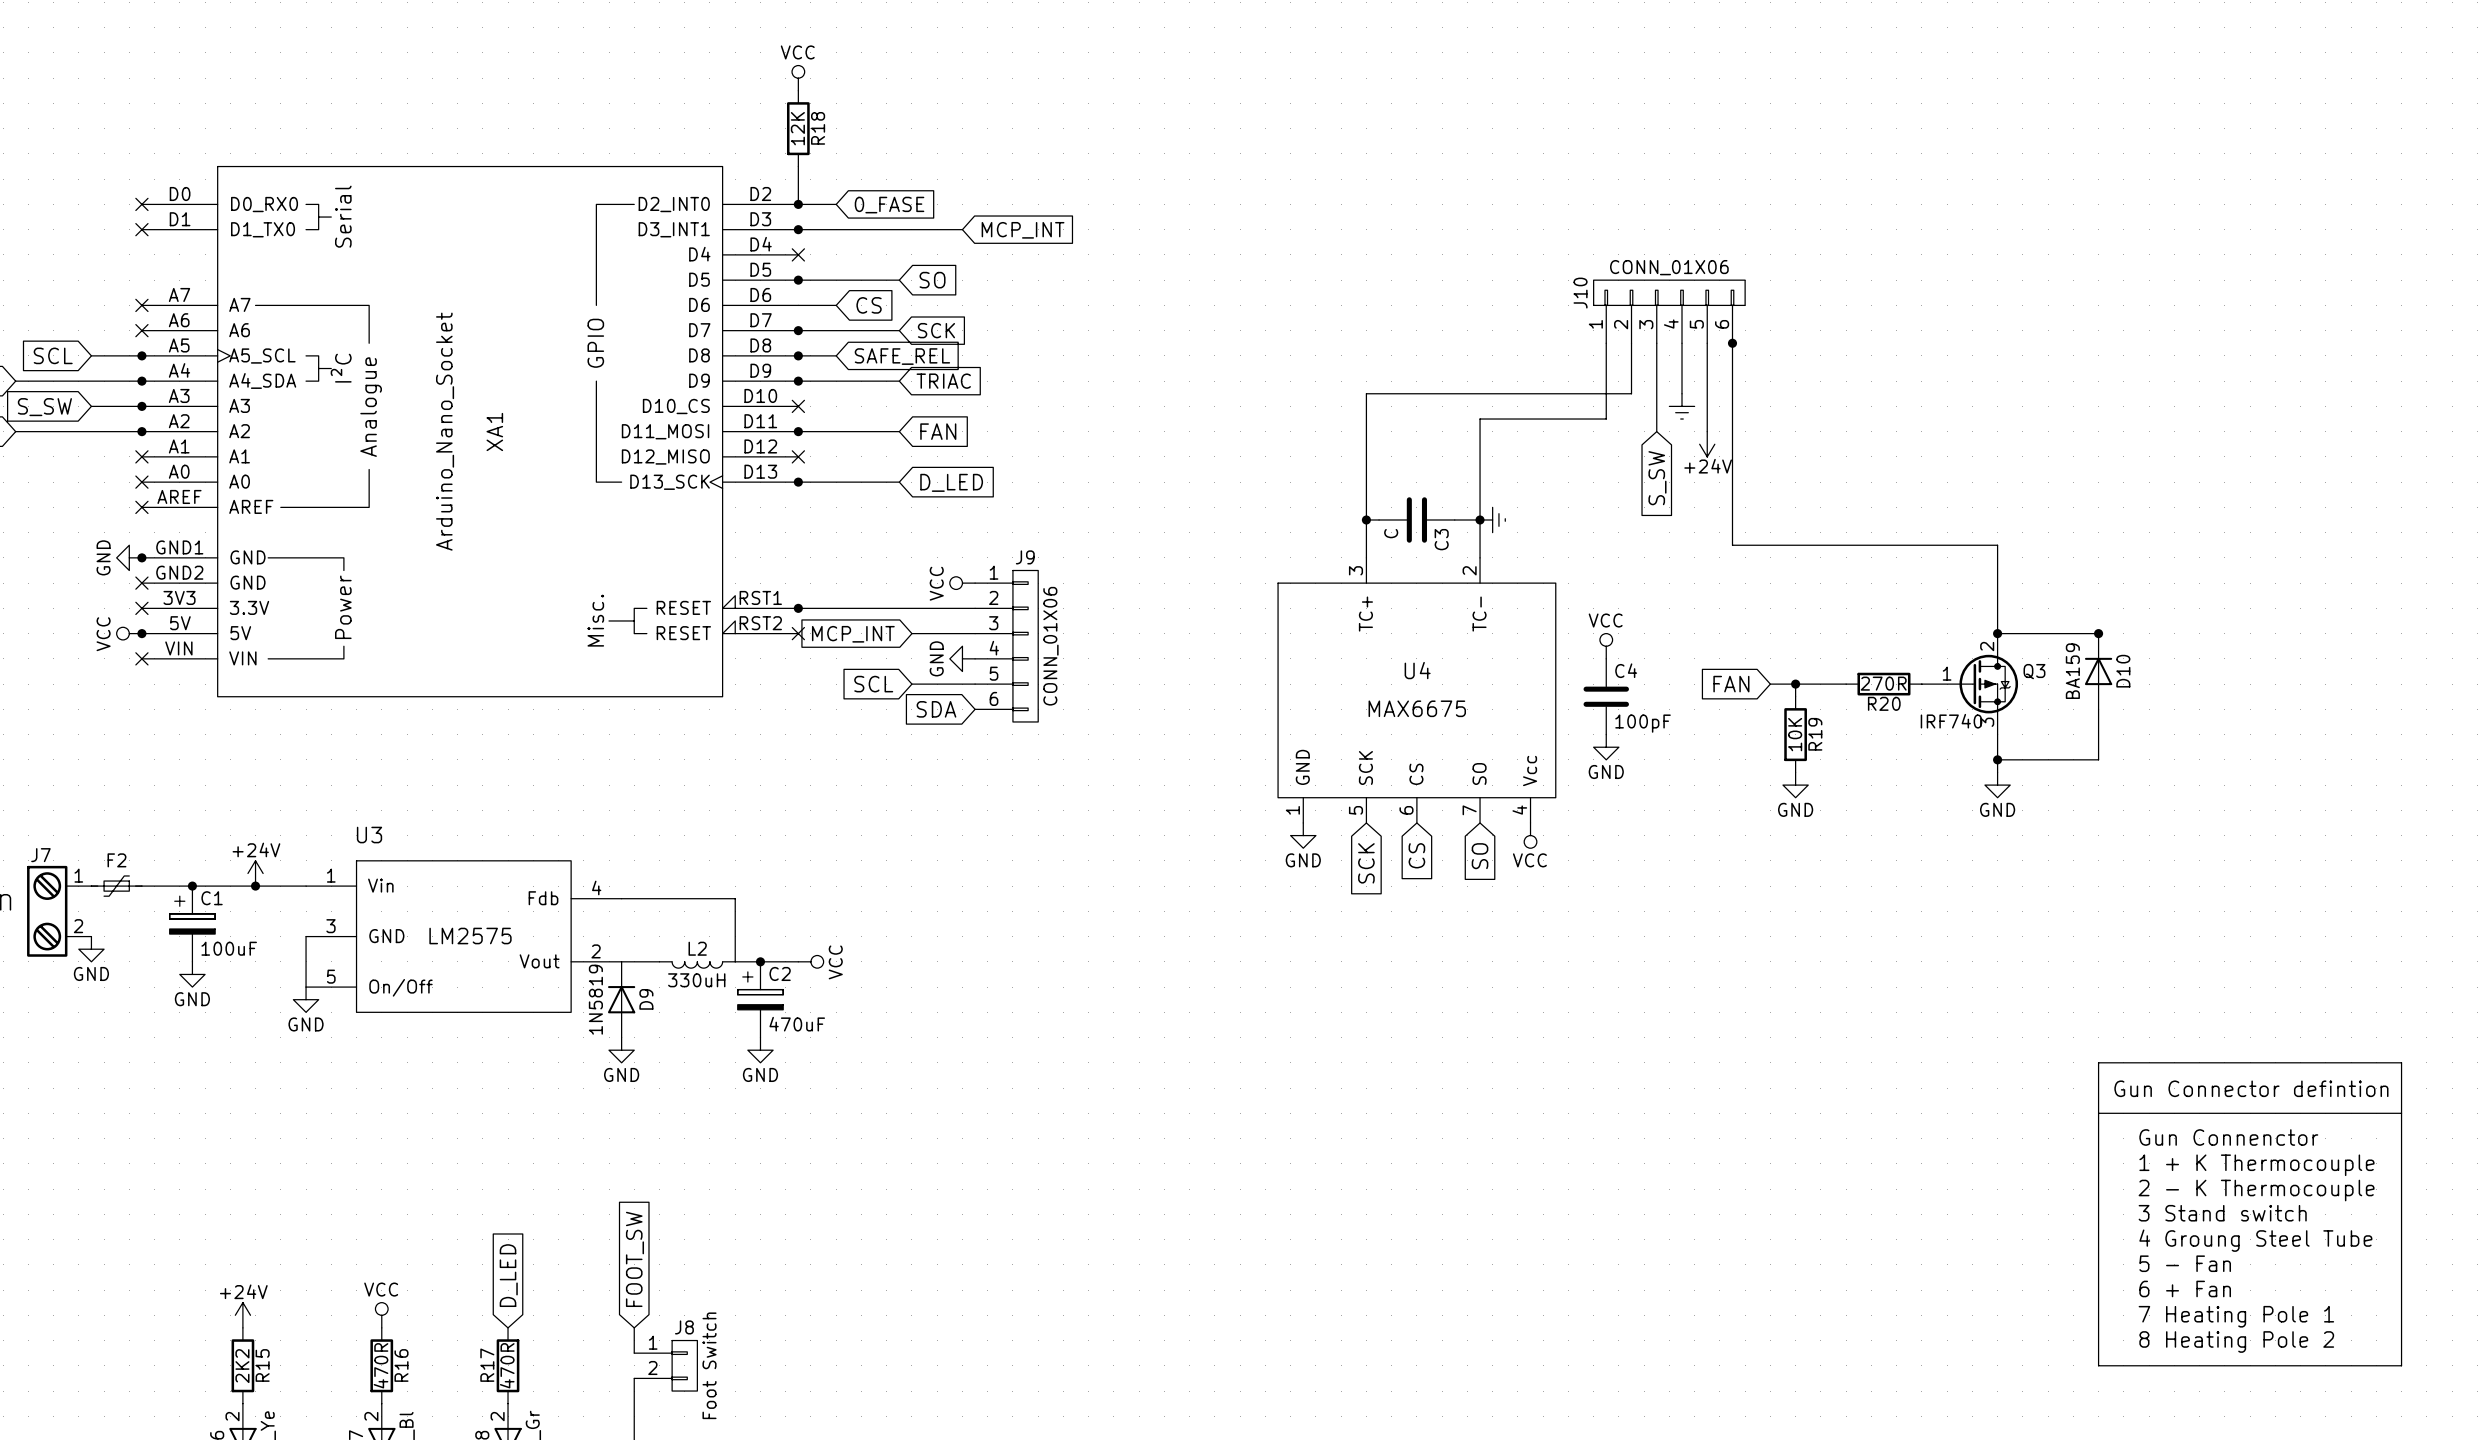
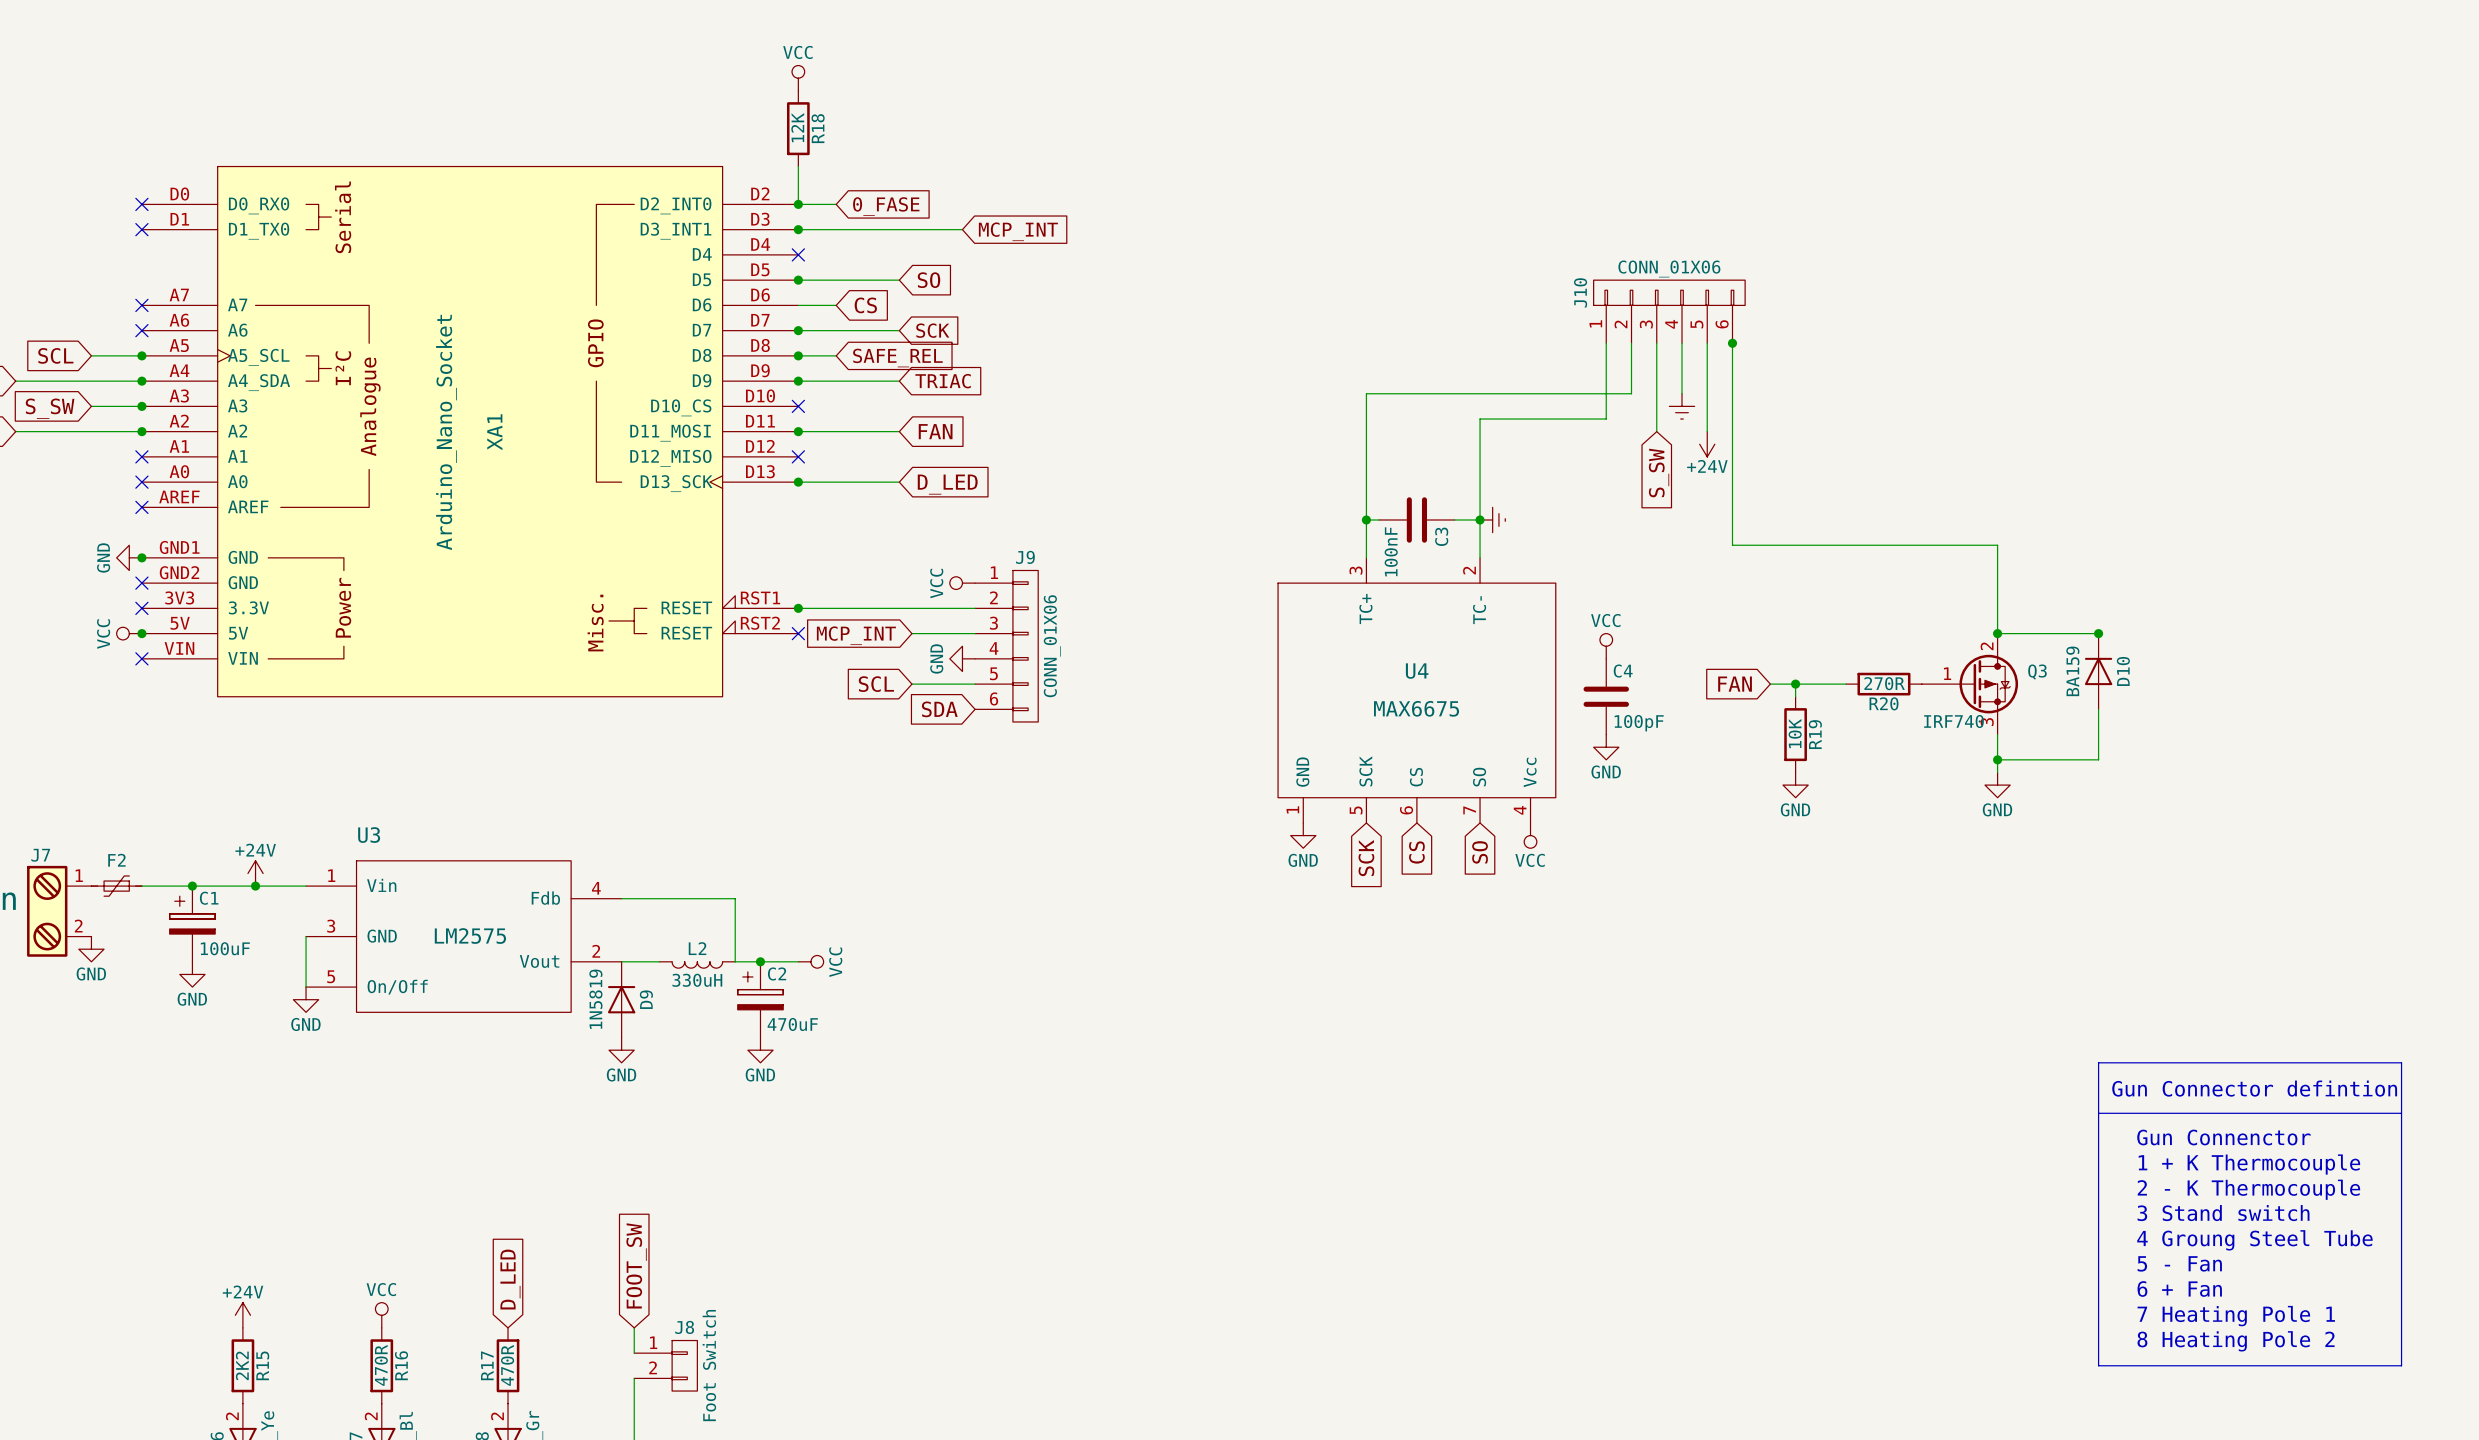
C3 value: C (1391, 533) -> 100nF (1391, 551)

